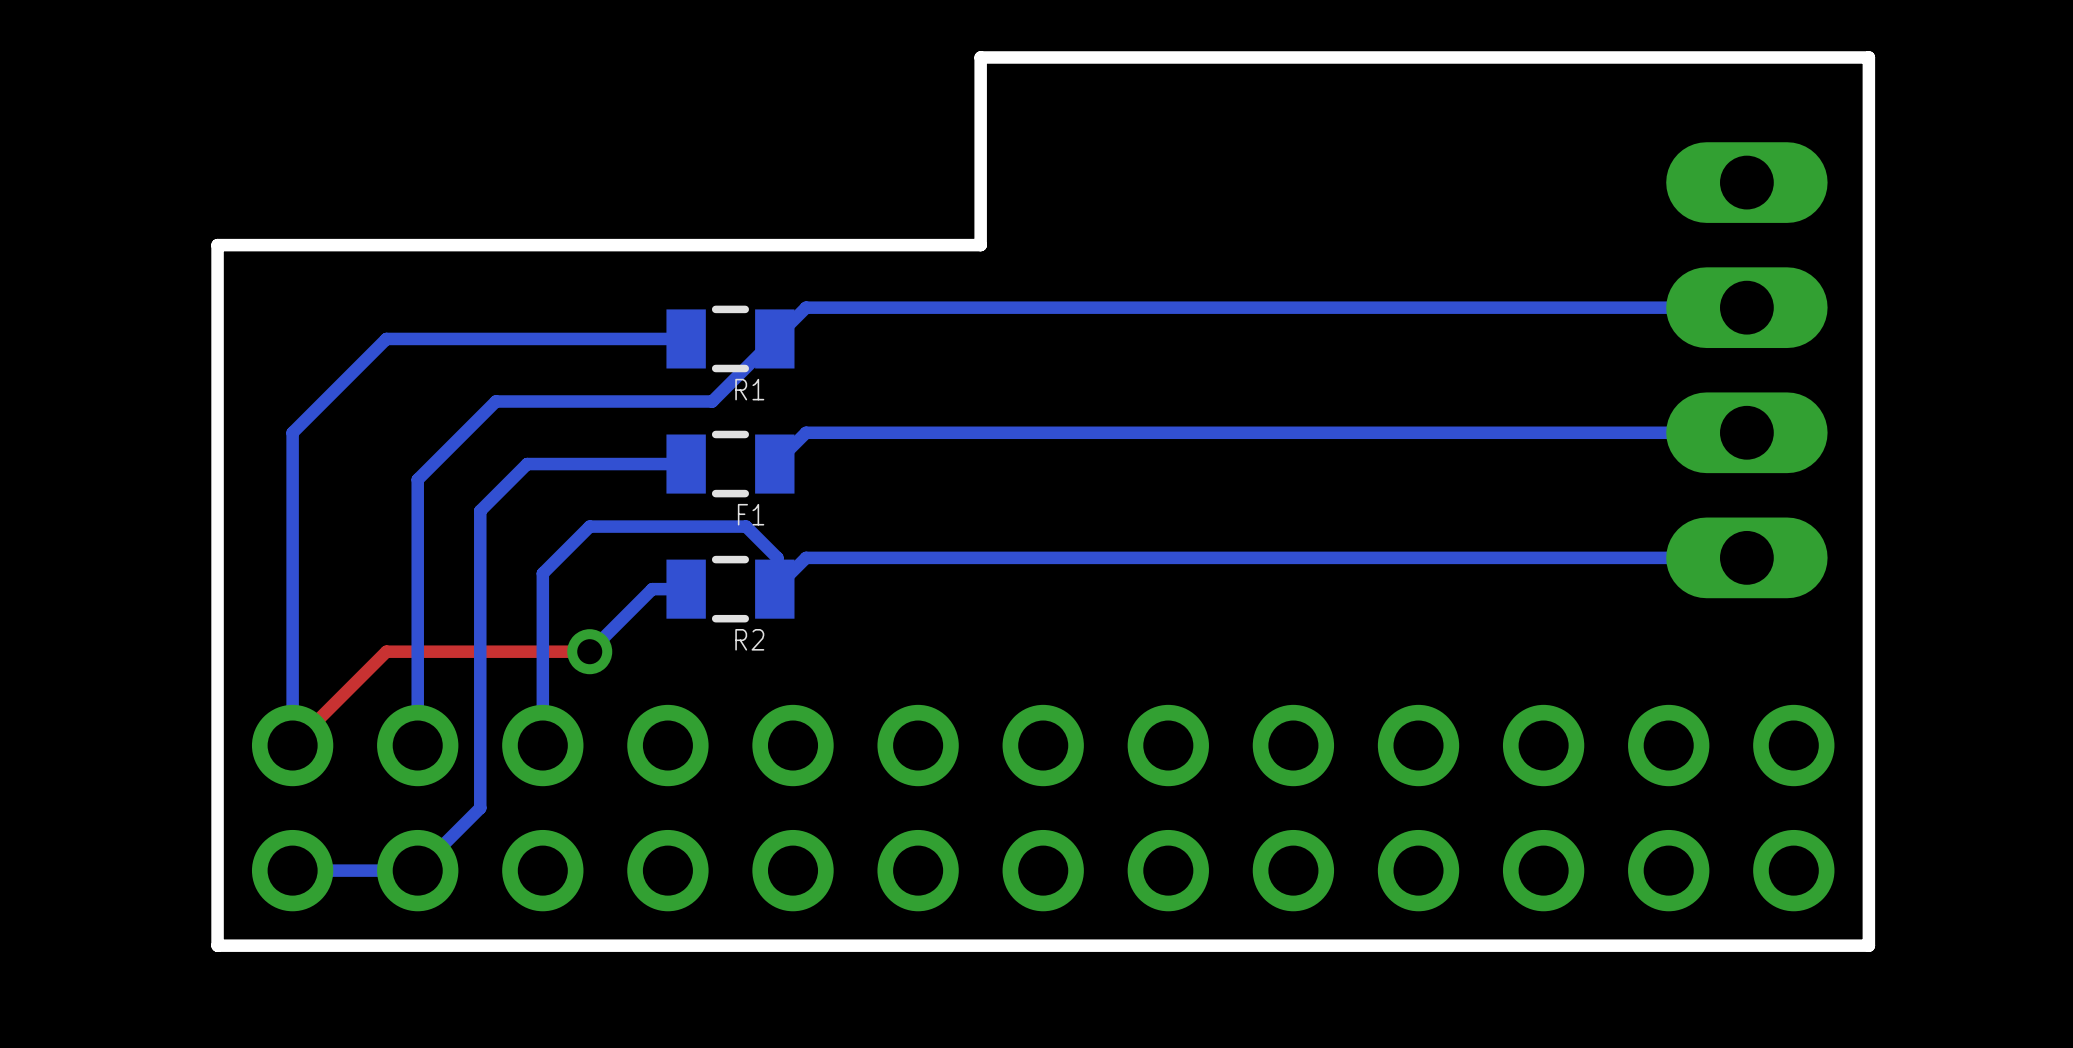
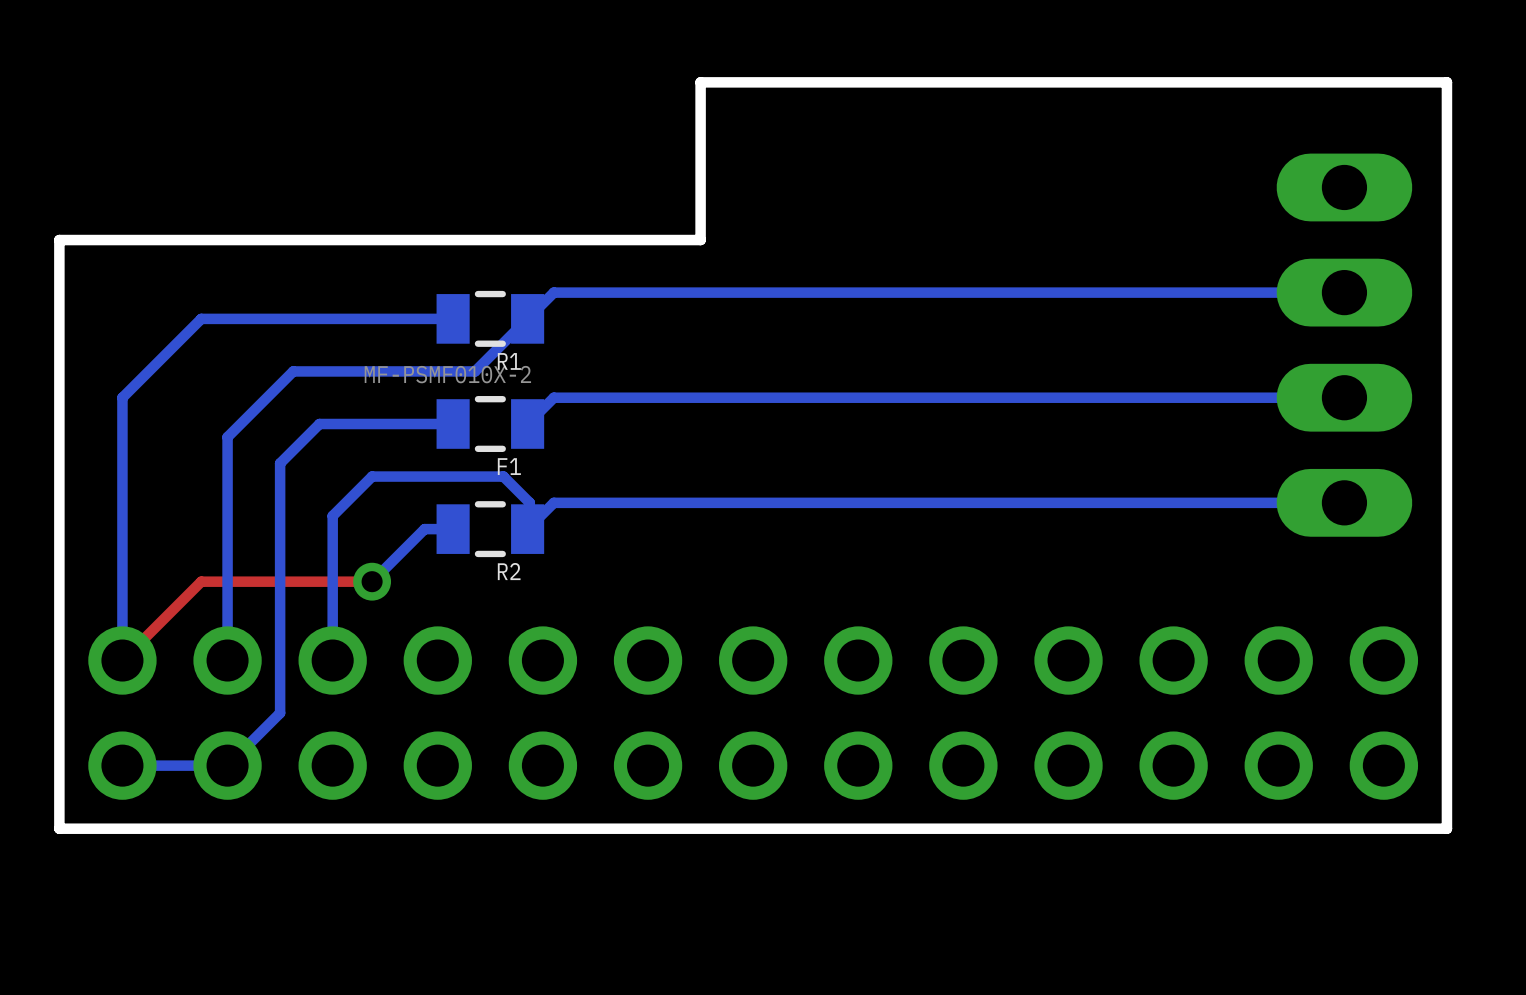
F1 value: none -> MF-PSMF010X-2 (447, 374)

